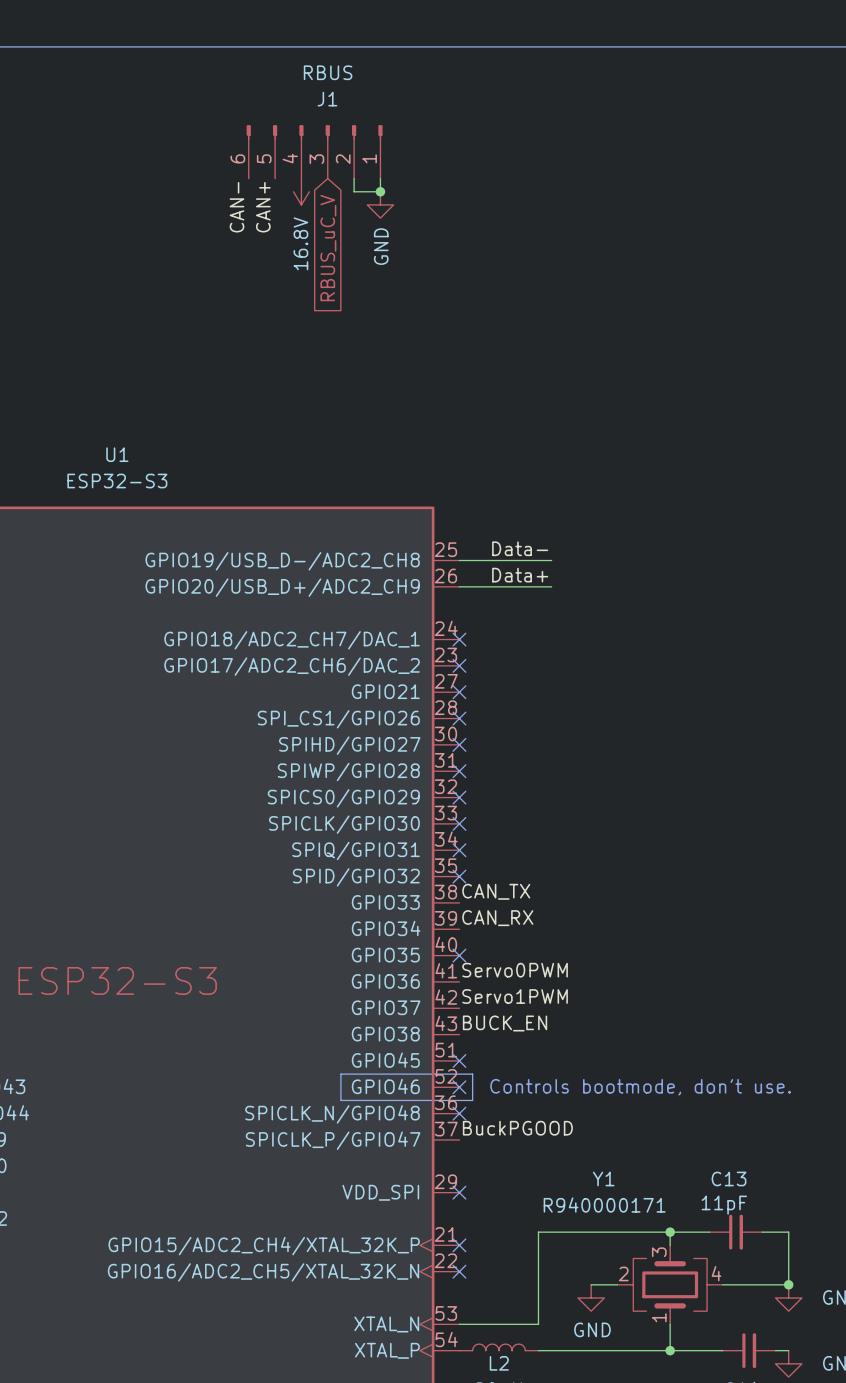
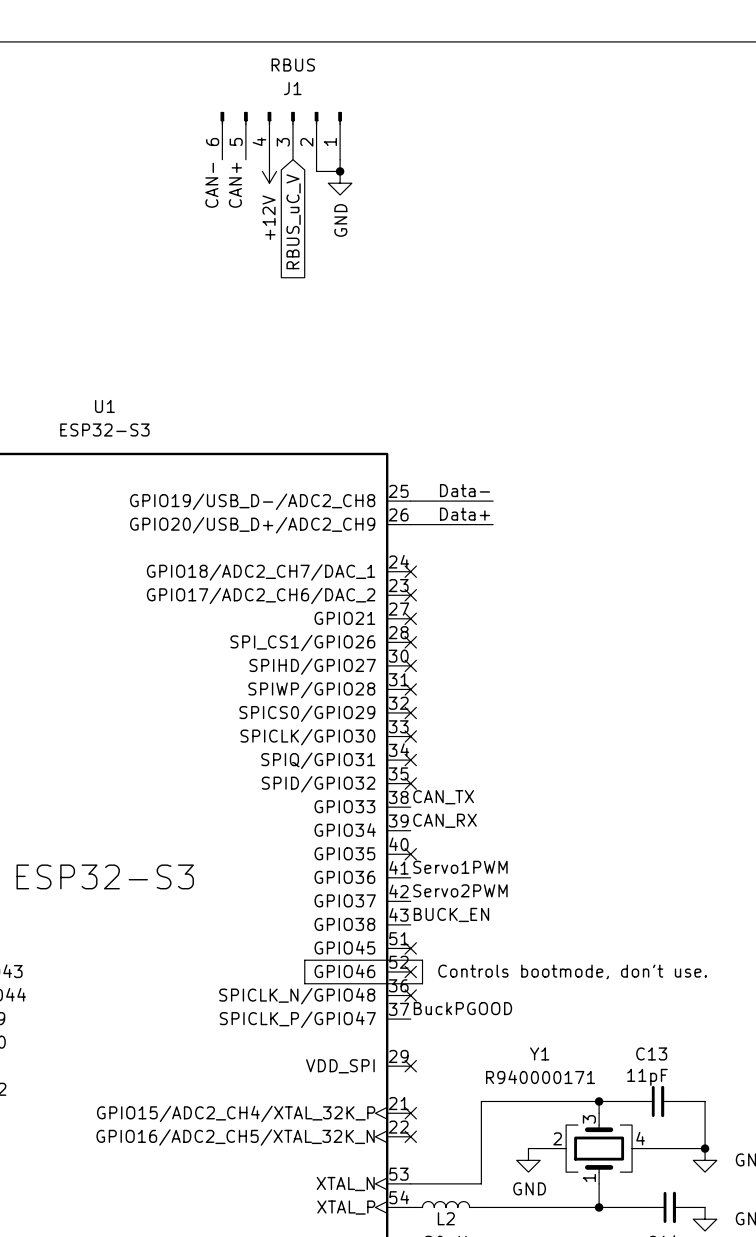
power symbol: 16.8V (301, 191) -> +12V (269, 171)
label: Servo0PWM (515, 970) -> Servo1PWM (460, 867)
label: Servo1PWM (515, 996) -> Servo2PWM (460, 890)

